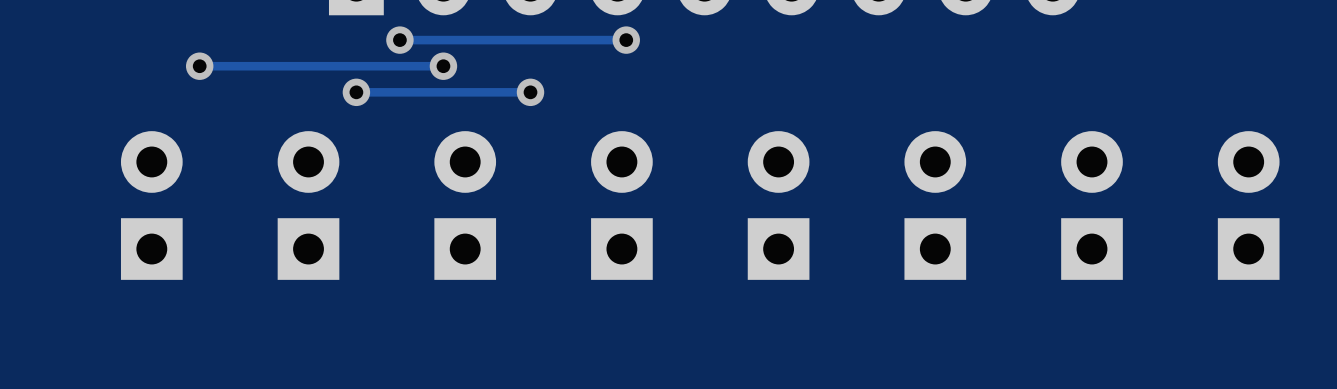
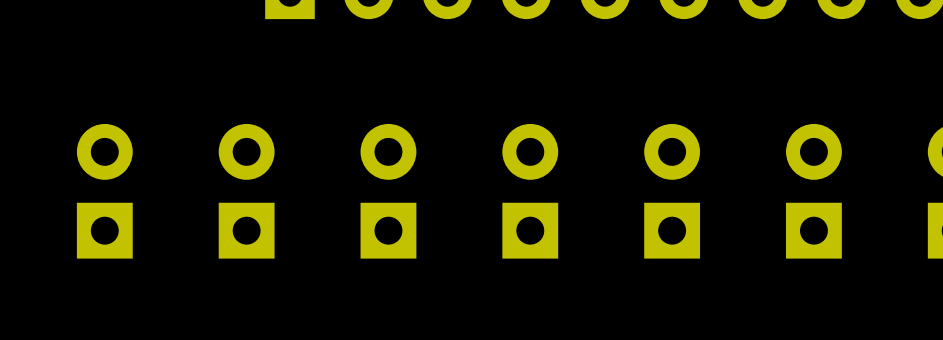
via: (399, 40) -> none
track: (626, 40) (399, 40) -> none
via: (626, 40) -> none
via: (199, 66) -> none
track: (443, 66) (199, 66) -> none
via: (443, 66) -> none
via: (356, 92) -> none
track: (530, 92) (356, 92) -> none
via: (530, 92) -> none

